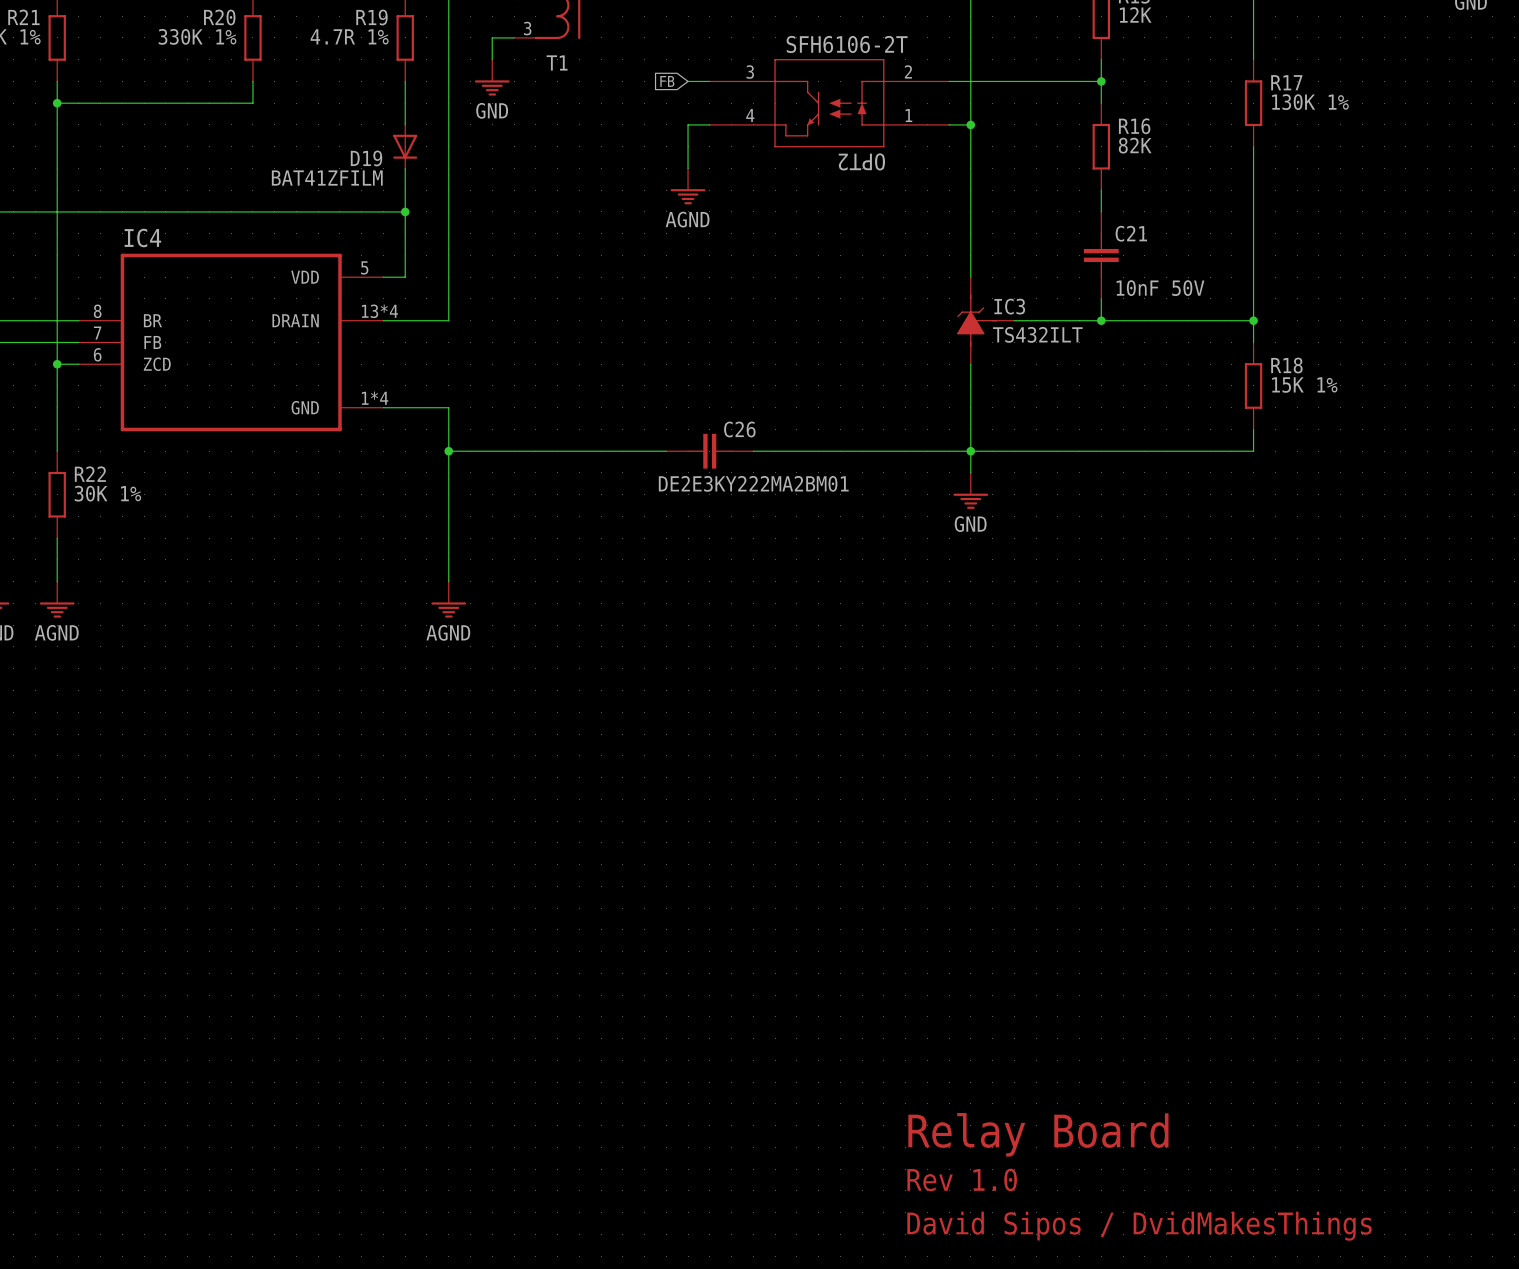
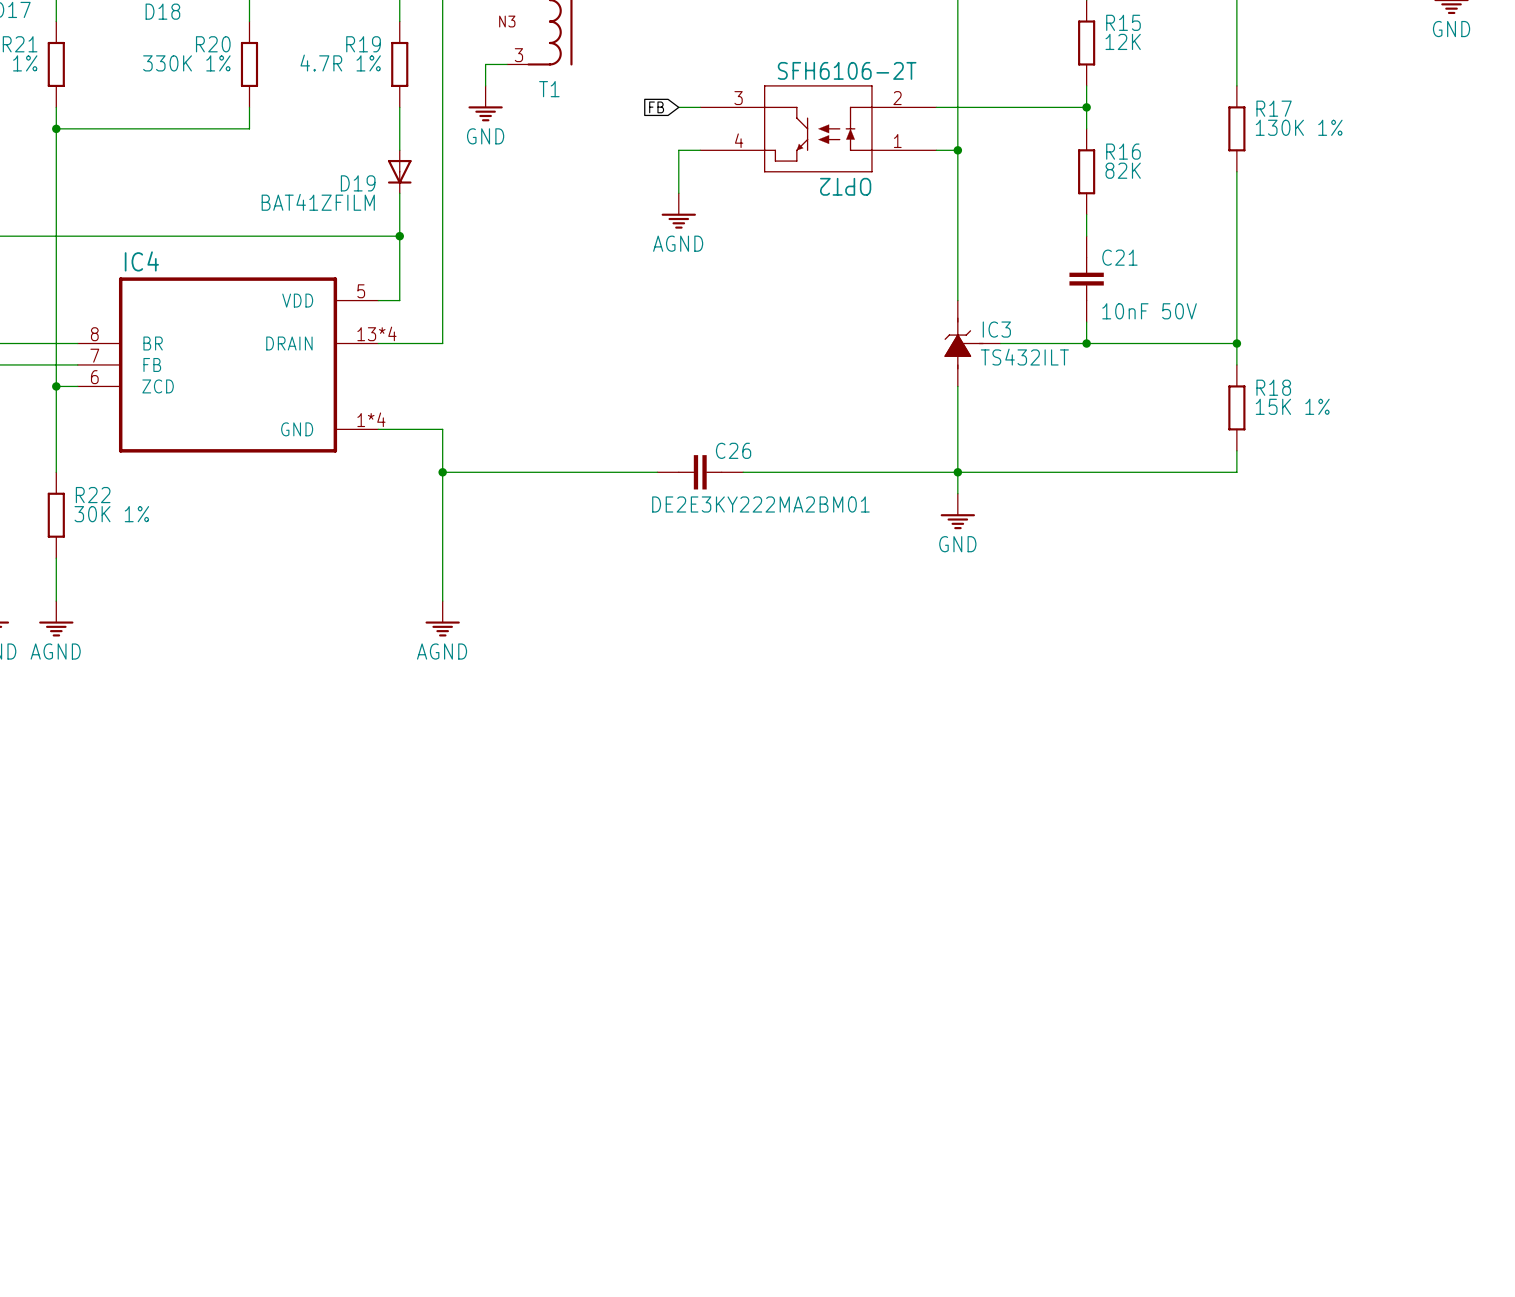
text: Relay Board (1038, 1134) -> none
text: Rev 1.0 (962, 1179) -> none
text: David Sipos / DvidMakesThings (1139, 1226) -> none

